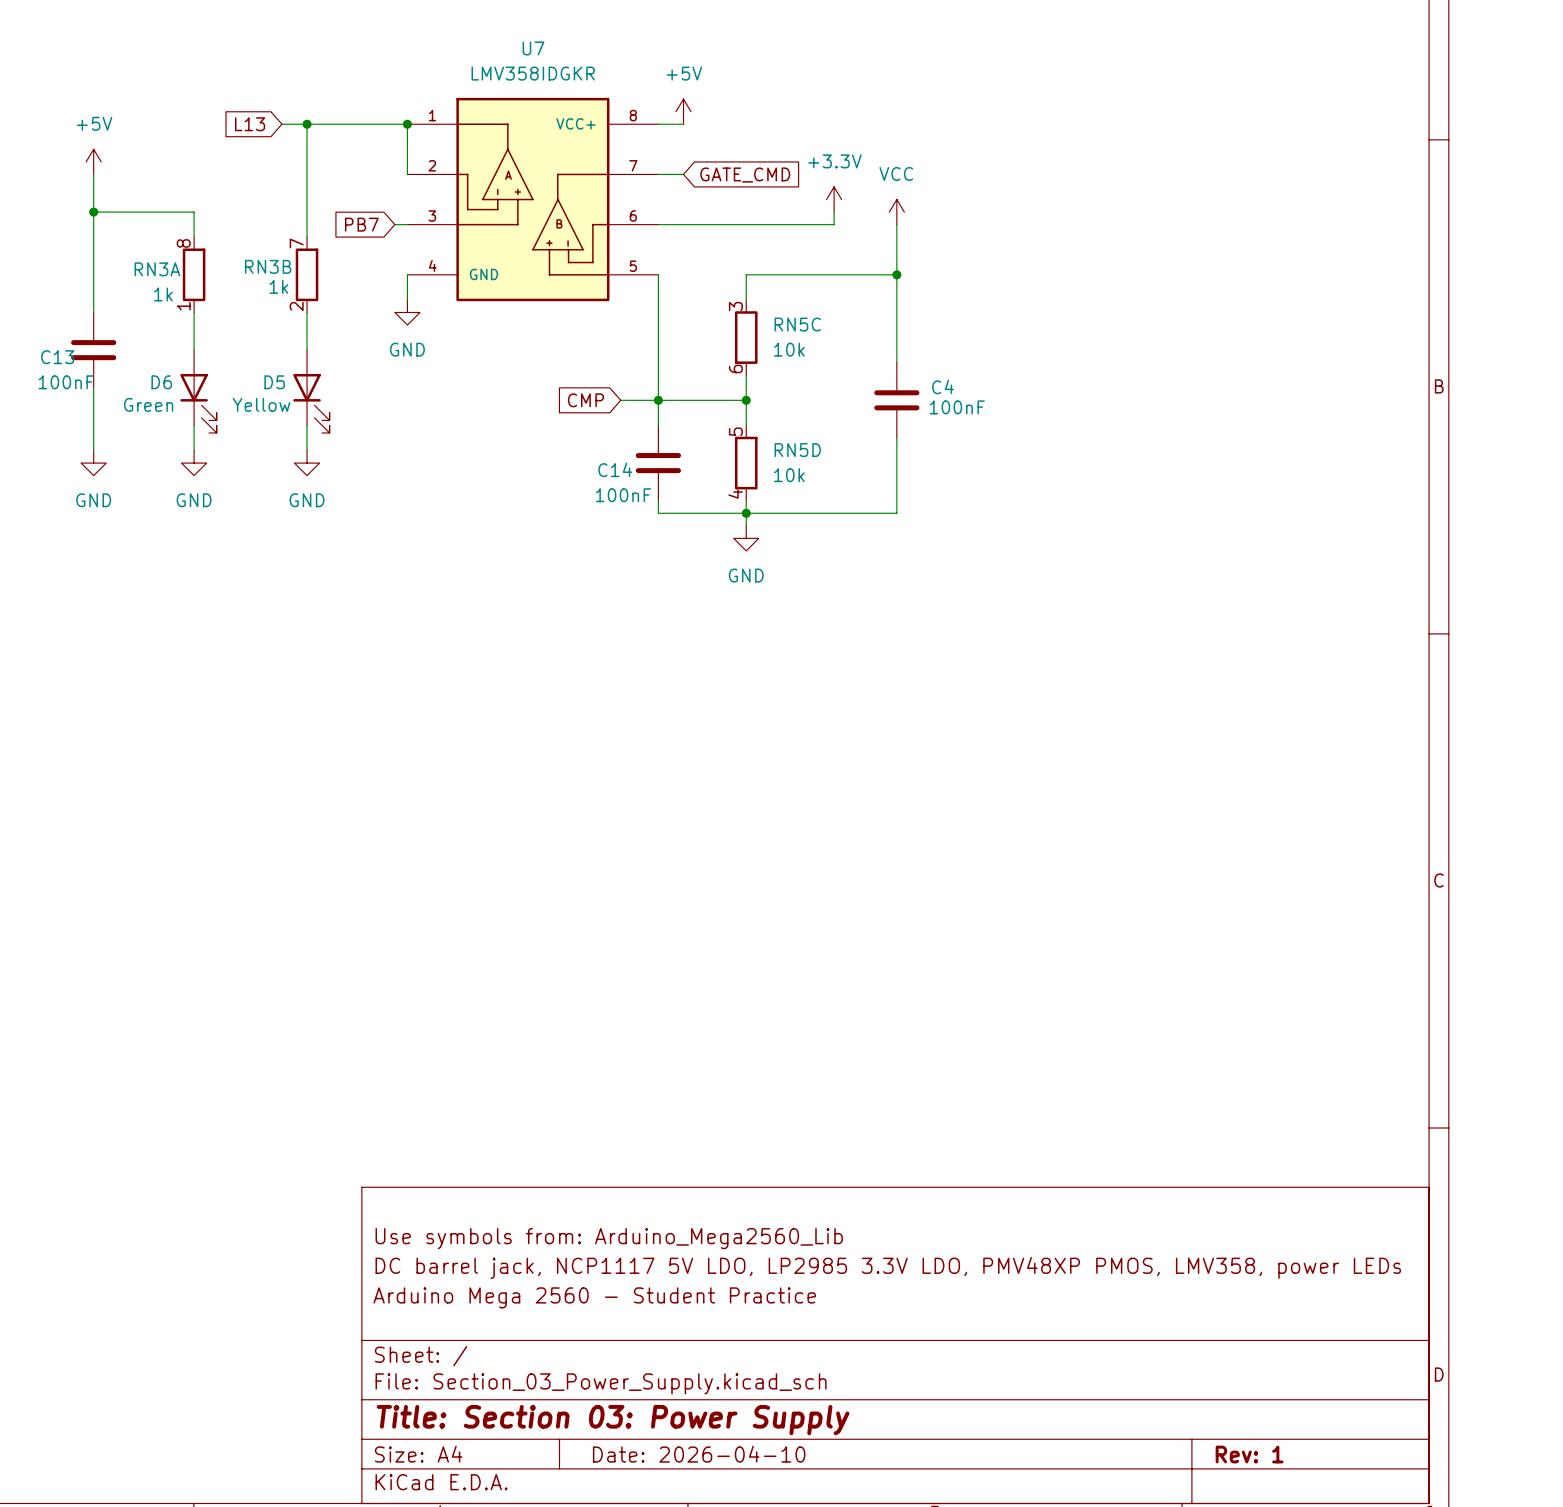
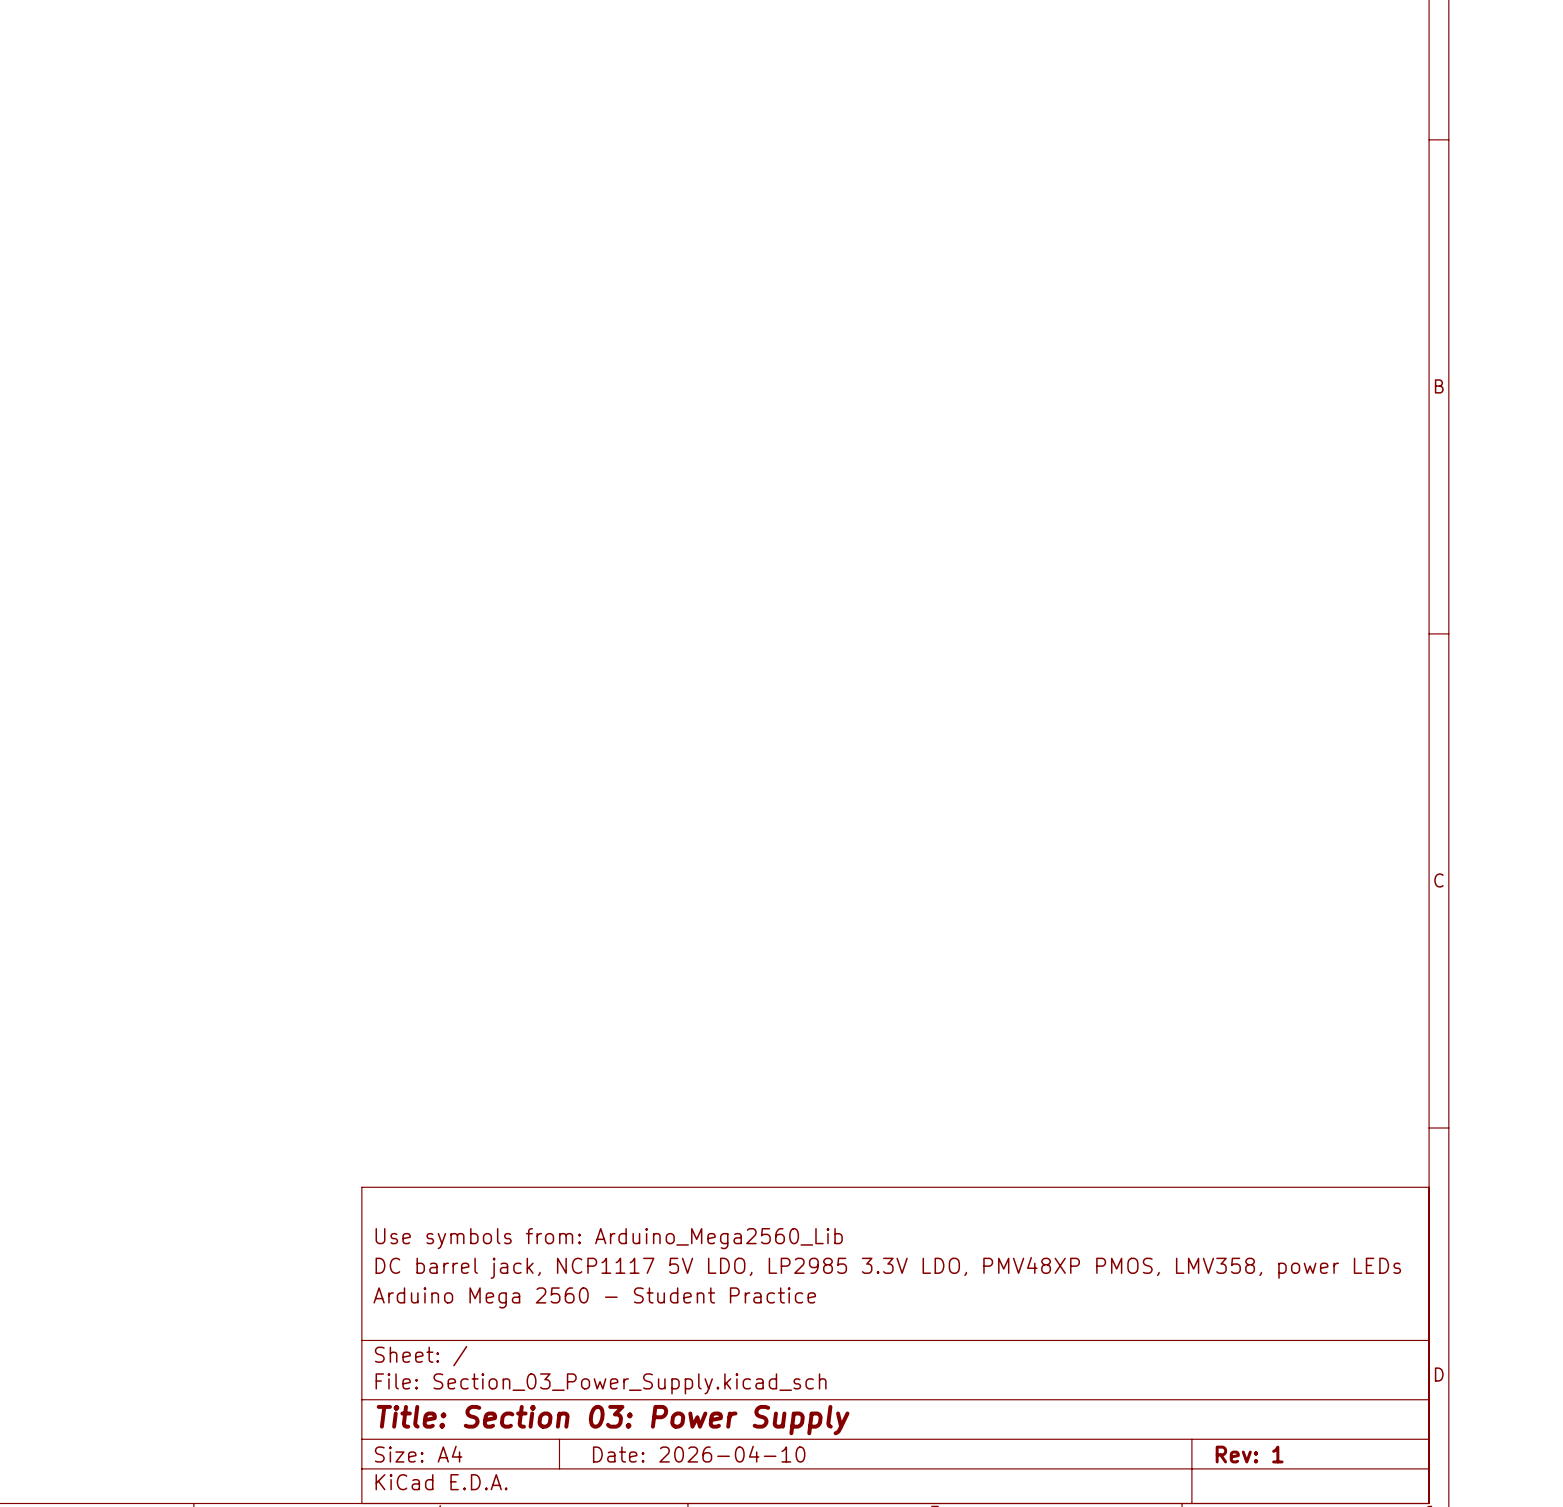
power symbol: +5V (683, 111) -> none
global label: L13 (250, 124) -> none
wire: (281, 124) (407, 124) (407, 174) -> none
wire: (307, 124) (307, 237) -> none
junction: (307, 124) -> none
junction: (407, 124) -> none
wire: (658, 124) (683, 124) -> none
power symbol: +5V (93, 161) -> none
wire: (93, 174) (93, 312) -> none
wire: (658, 174) (683, 174) -> none
global label: GATE_CMD (745, 175) -> none
U7: LMV358IDGKR (532, 199) -> none
power symbol: +3.3V (834, 199) -> none
wire: (93, 212) (194, 212) (194, 237) -> none
junction: (93, 212) -> none
wire: (834, 212) (834, 224) (658, 224) -> none
power symbol: VCC (896, 212) -> none
global label: PB7 (361, 224) -> none
wire: (394, 224) (407, 224) -> none
wire: (896, 224) (896, 362) -> none
RN3A: 1k (194, 274) -> none
RN3B: 1k (307, 274) -> none
wire: (407, 274) (407, 299) -> none
wire: (658, 274) (658, 425) -> none
wire: (896, 274) (746, 274) (746, 299) -> none
junction: (896, 274) -> none
wire: (194, 312) (194, 350) -> none
wire: (307, 312) (307, 350) -> none
power symbol: GND (407, 312) -> none
RN5C: 10k (746, 337) -> none
C13: 100nF (93, 350) -> none
wire: (746, 375) (746, 425) -> none
wire: (93, 387) (93, 450) -> none
D6: Green (198, 391) -> none
D5: Yellow (311, 391) -> none
global label: CMP (585, 400) -> none
wire: (620, 400) (746, 400) -> none
junction: (658, 400) -> none
junction: (746, 400) -> none
C4: 100nF (896, 400) -> none
wire: (194, 425) (194, 450) -> none
wire: (307, 425) (307, 450) -> none
wire: (896, 437) (896, 513) (658, 513) (658, 500) -> none
power symbol: GND (93, 463) -> none
power symbol: GND (194, 463) -> none
power symbol: GND (307, 463) -> none
C14: 100nF (658, 463) -> none
RN5D: 10k (746, 463) -> none
wire: (746, 500) (746, 525) -> none
junction: (746, 513) -> none
power symbol: GND (746, 538) -> none

